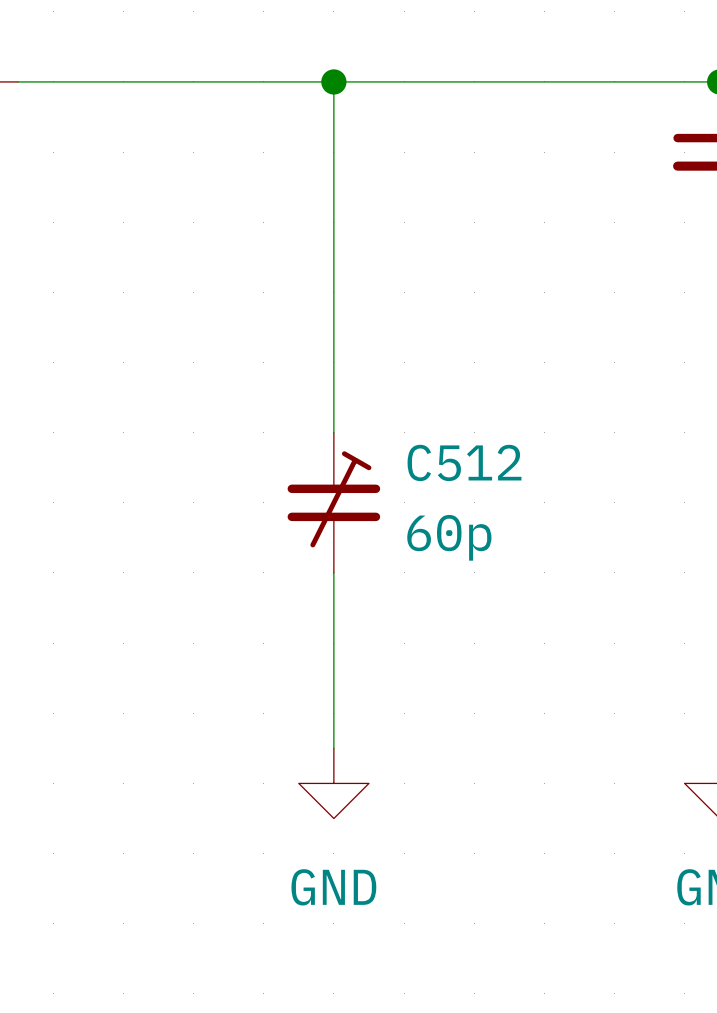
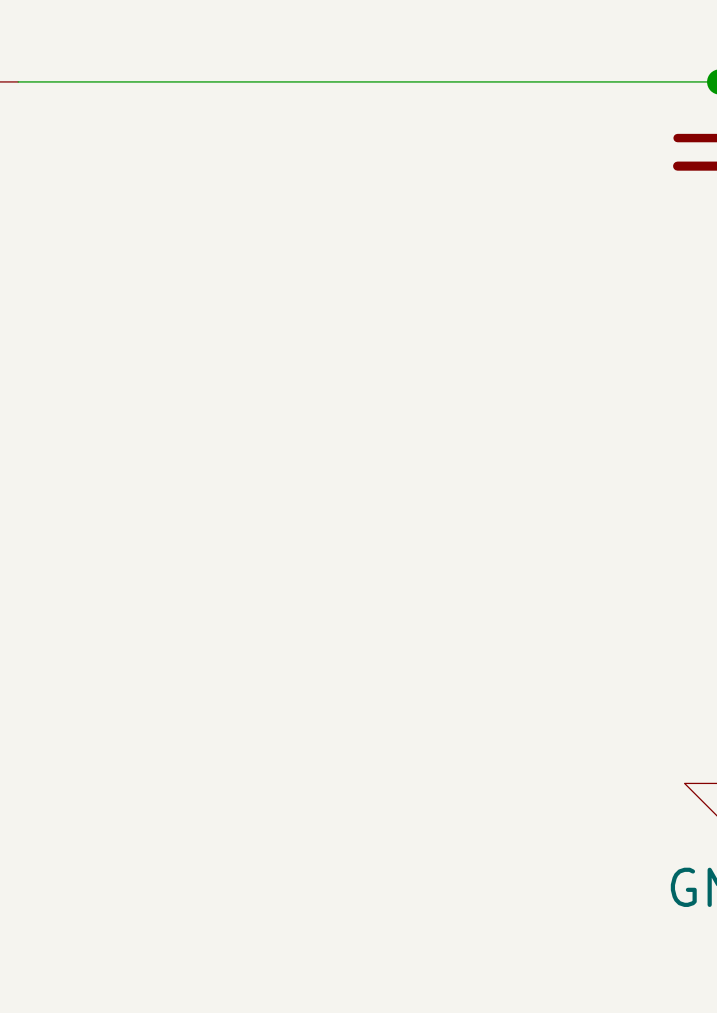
wire: (333, 81) (333, 432) -> none
junction: (333, 81) -> none
C512: 60p (333, 502) -> none
wire: (333, 572) (333, 748) -> none
power symbol: GND (333, 783) -> none

